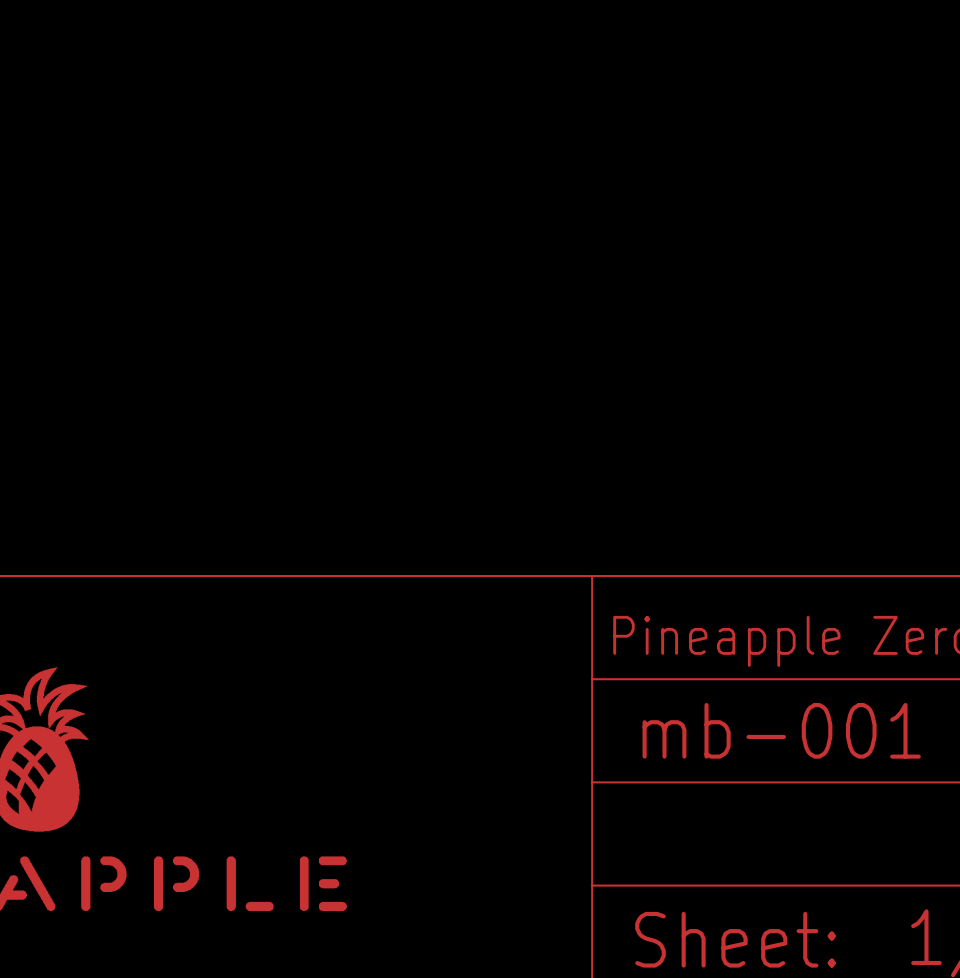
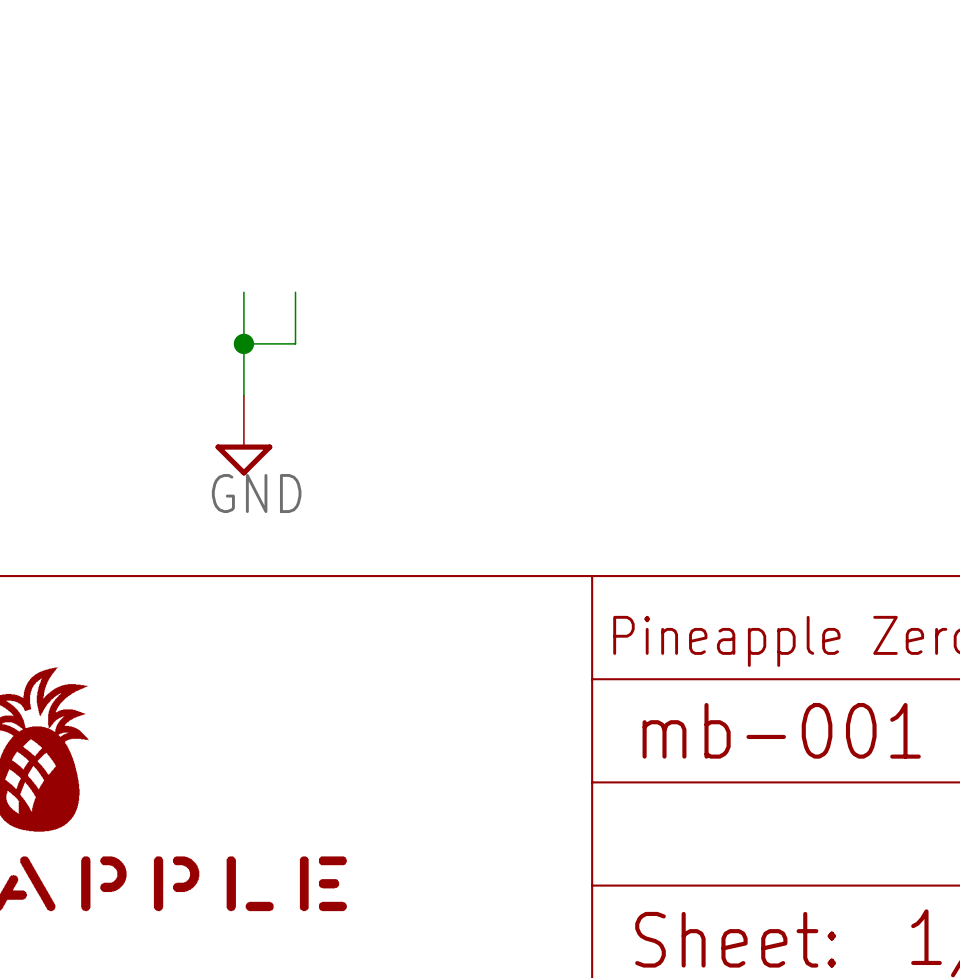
wire: none -> (243, 292) (243, 395)
wire: none -> (295, 292) (295, 343) (243, 343)
junction: none -> (243, 343)
power symbol: none -> GND (243, 435)

